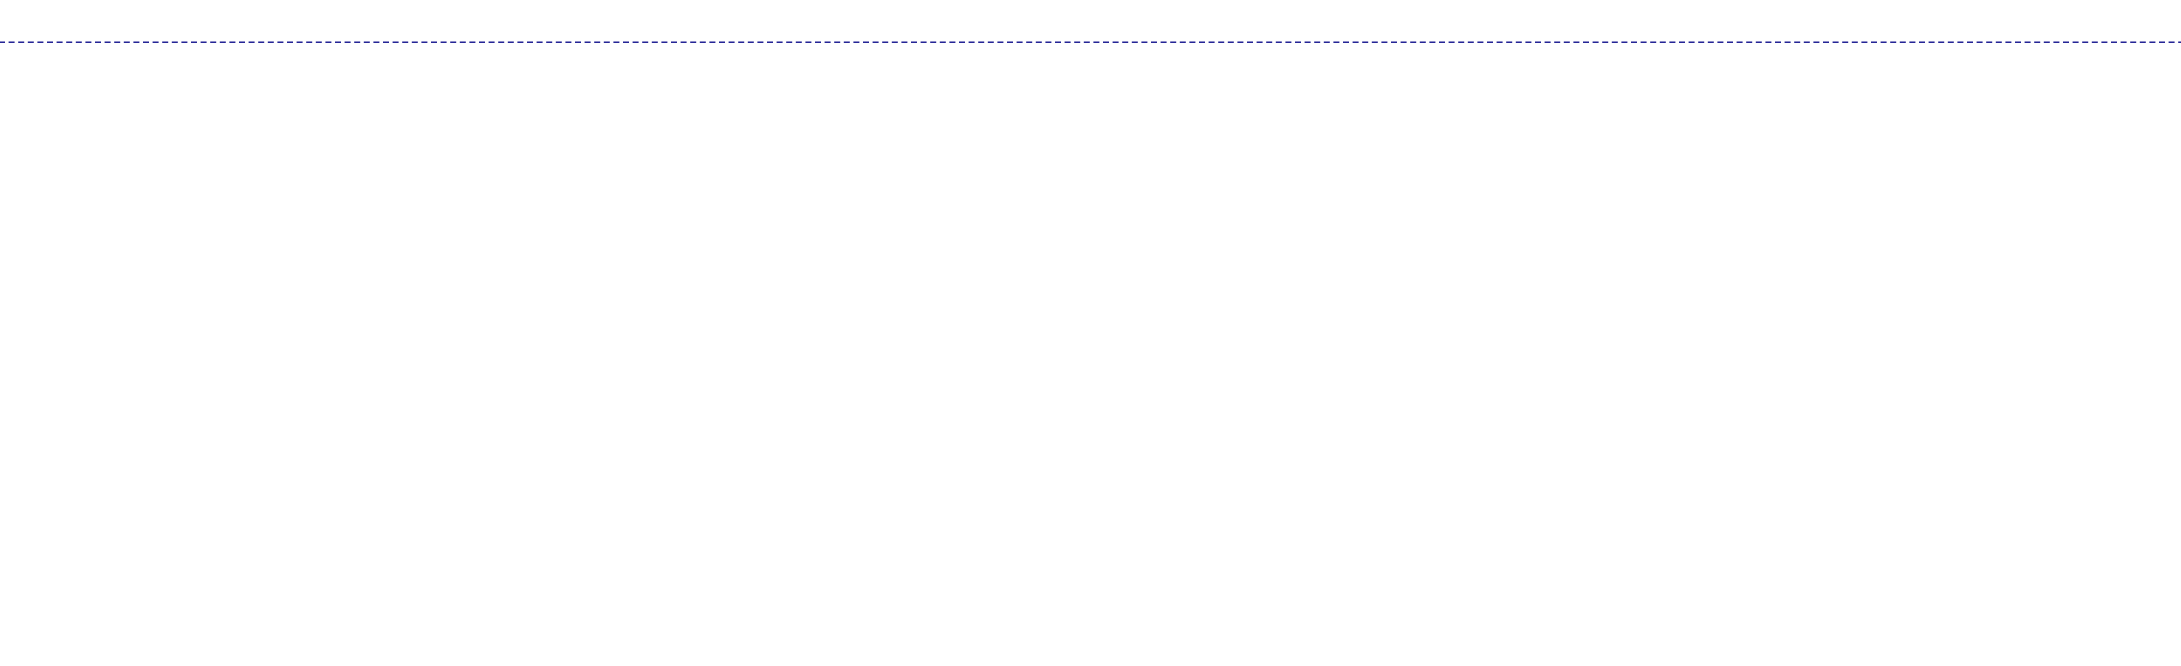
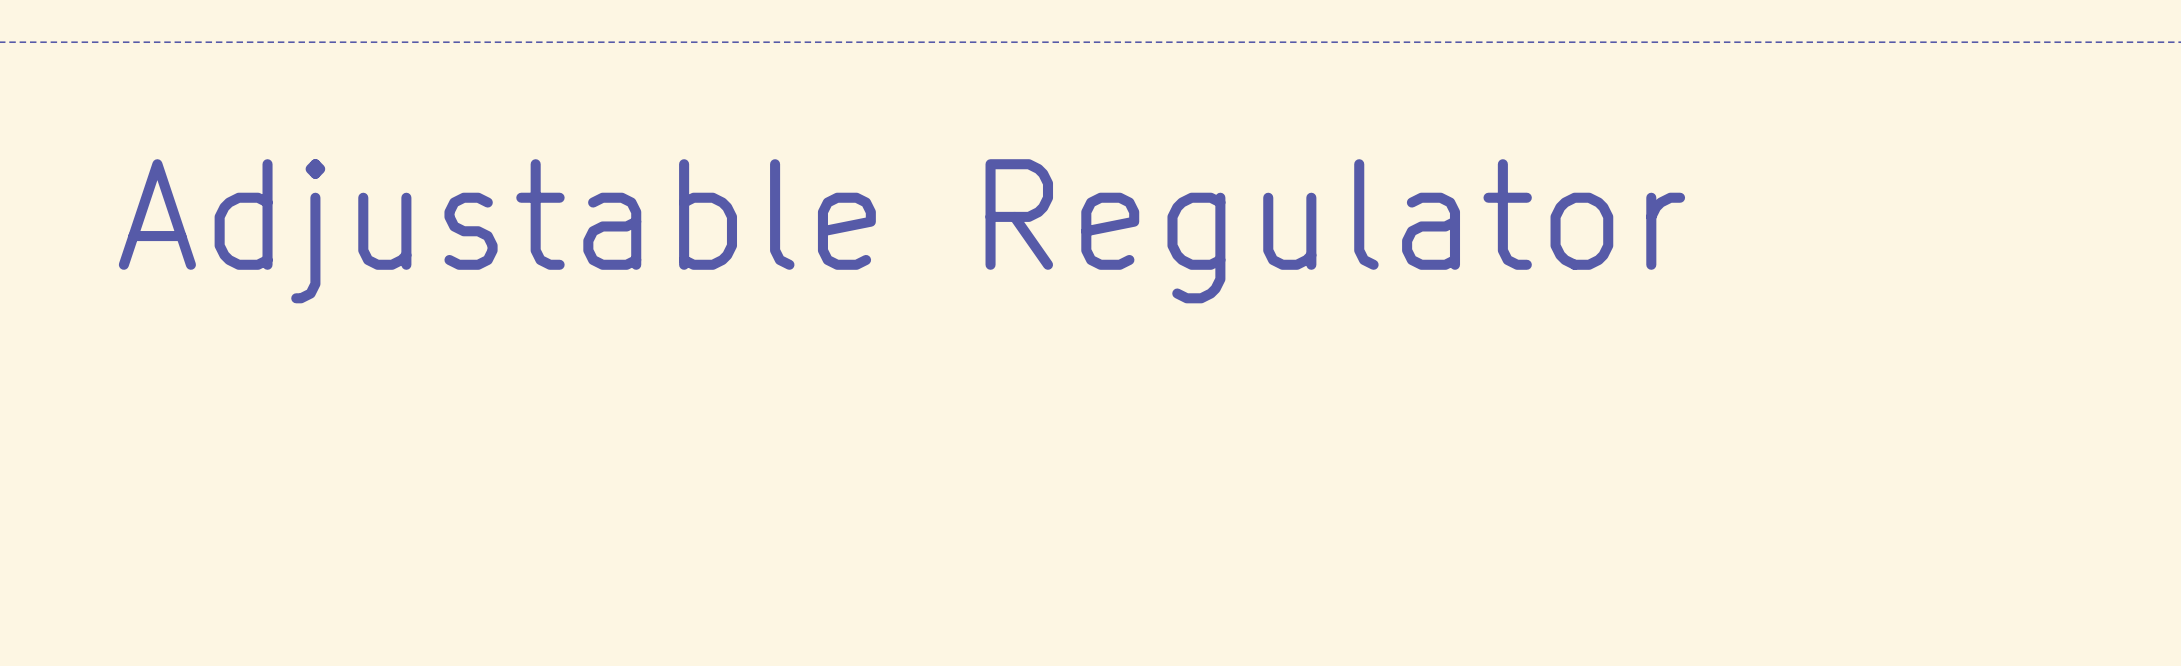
text: none -> Adjustable Regulator (901, 231)

